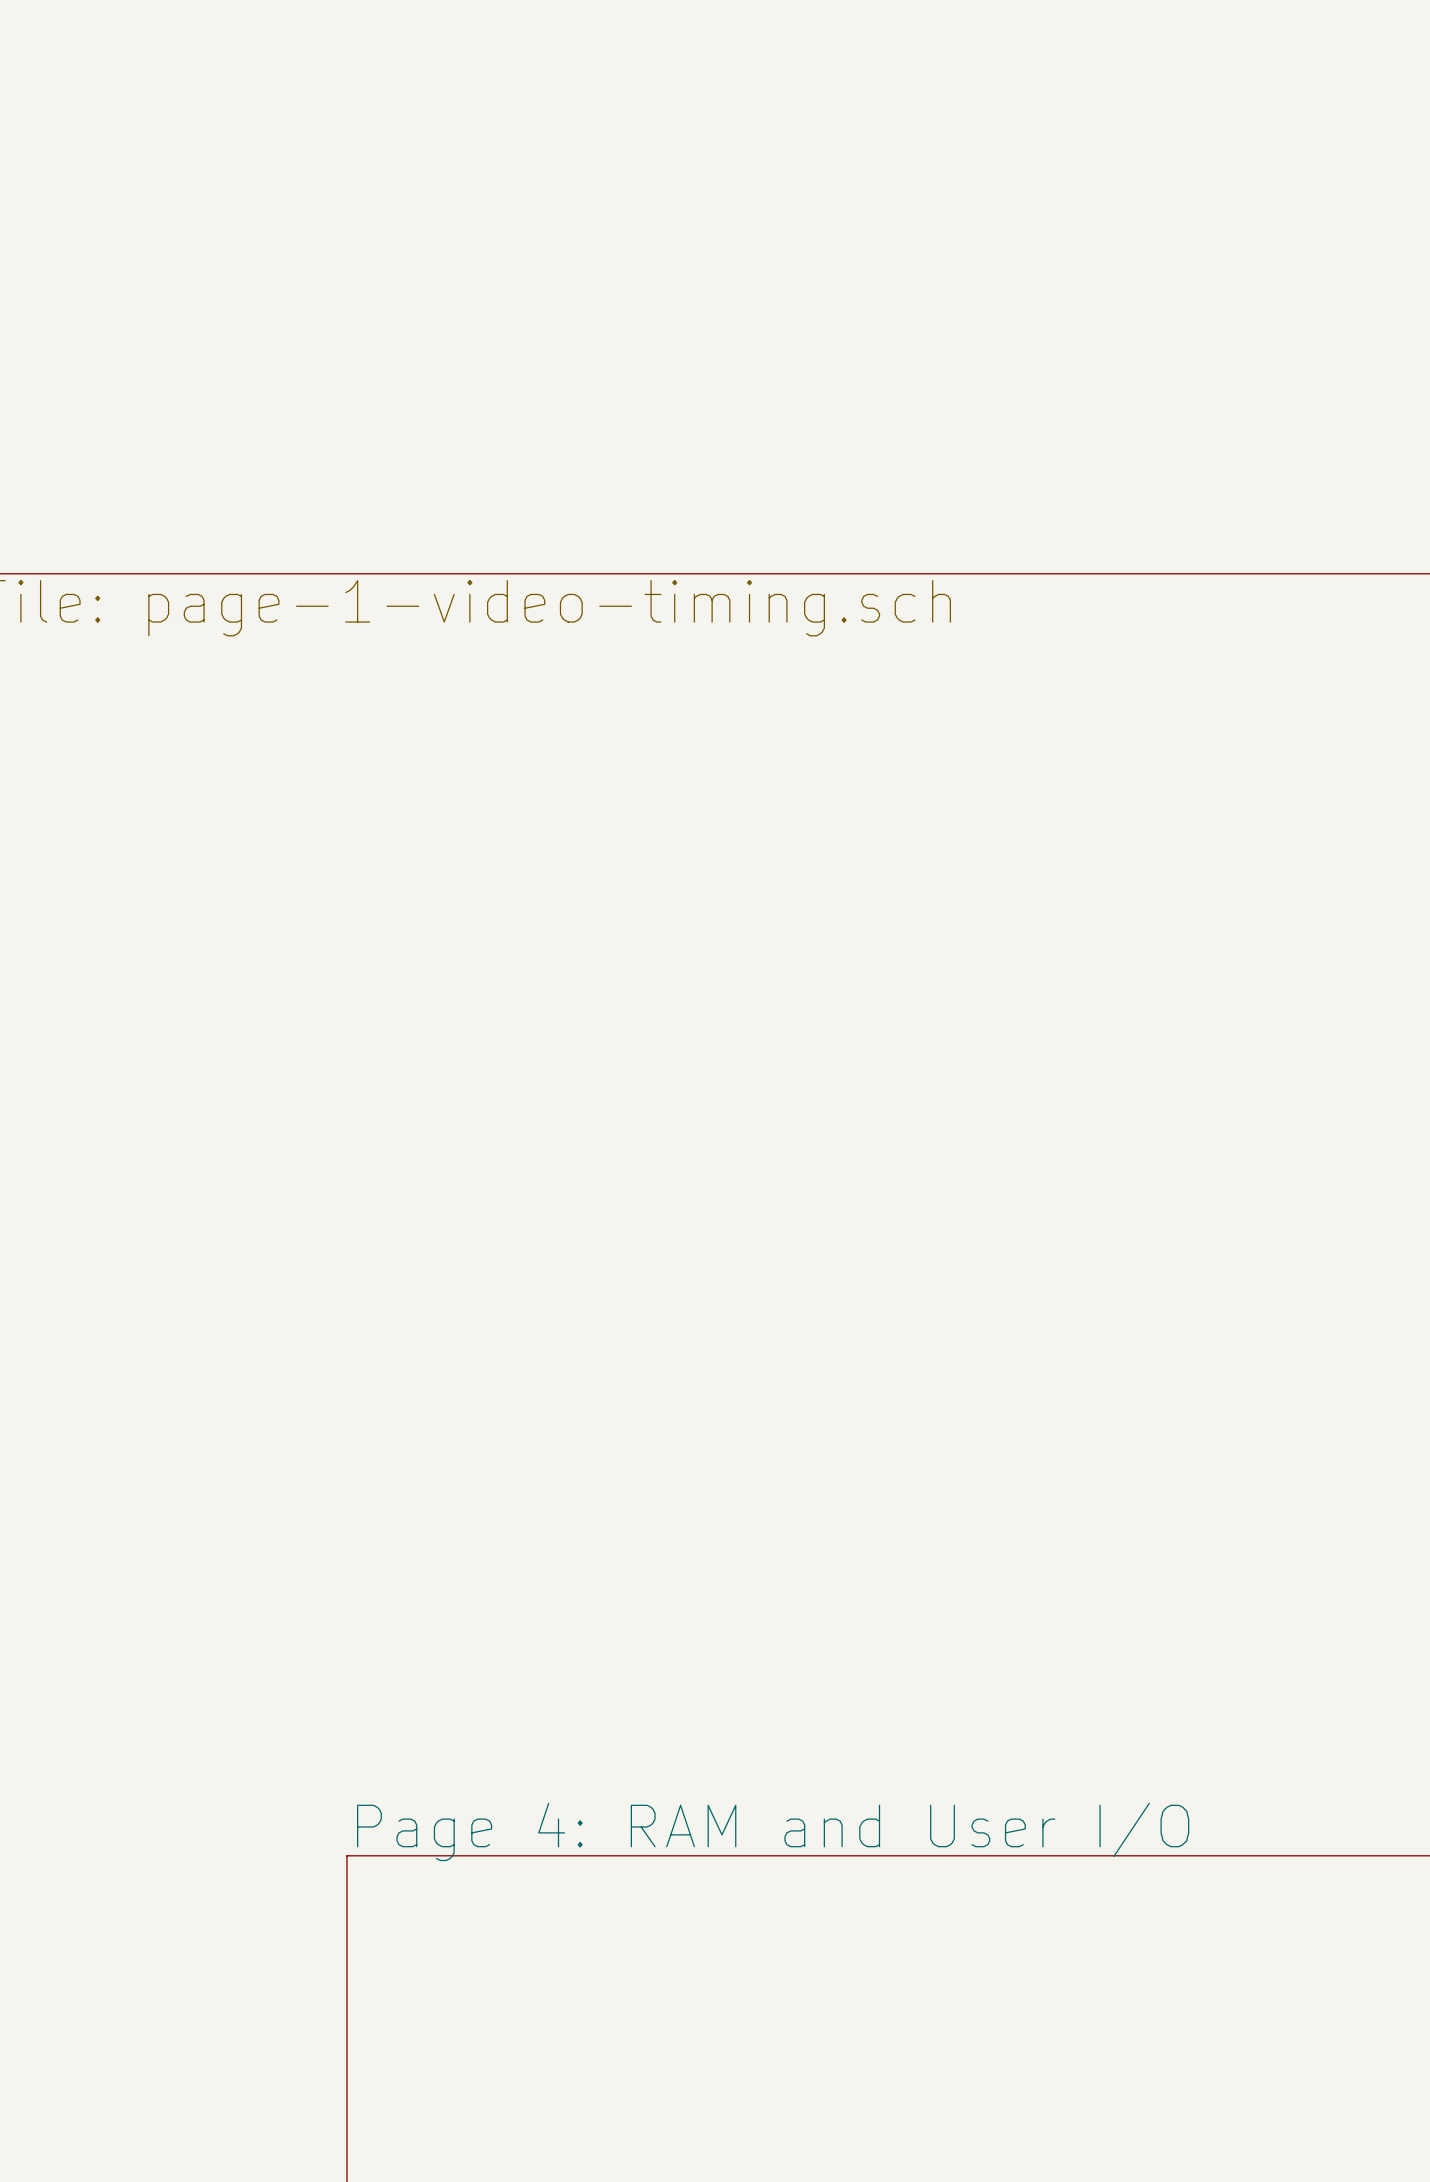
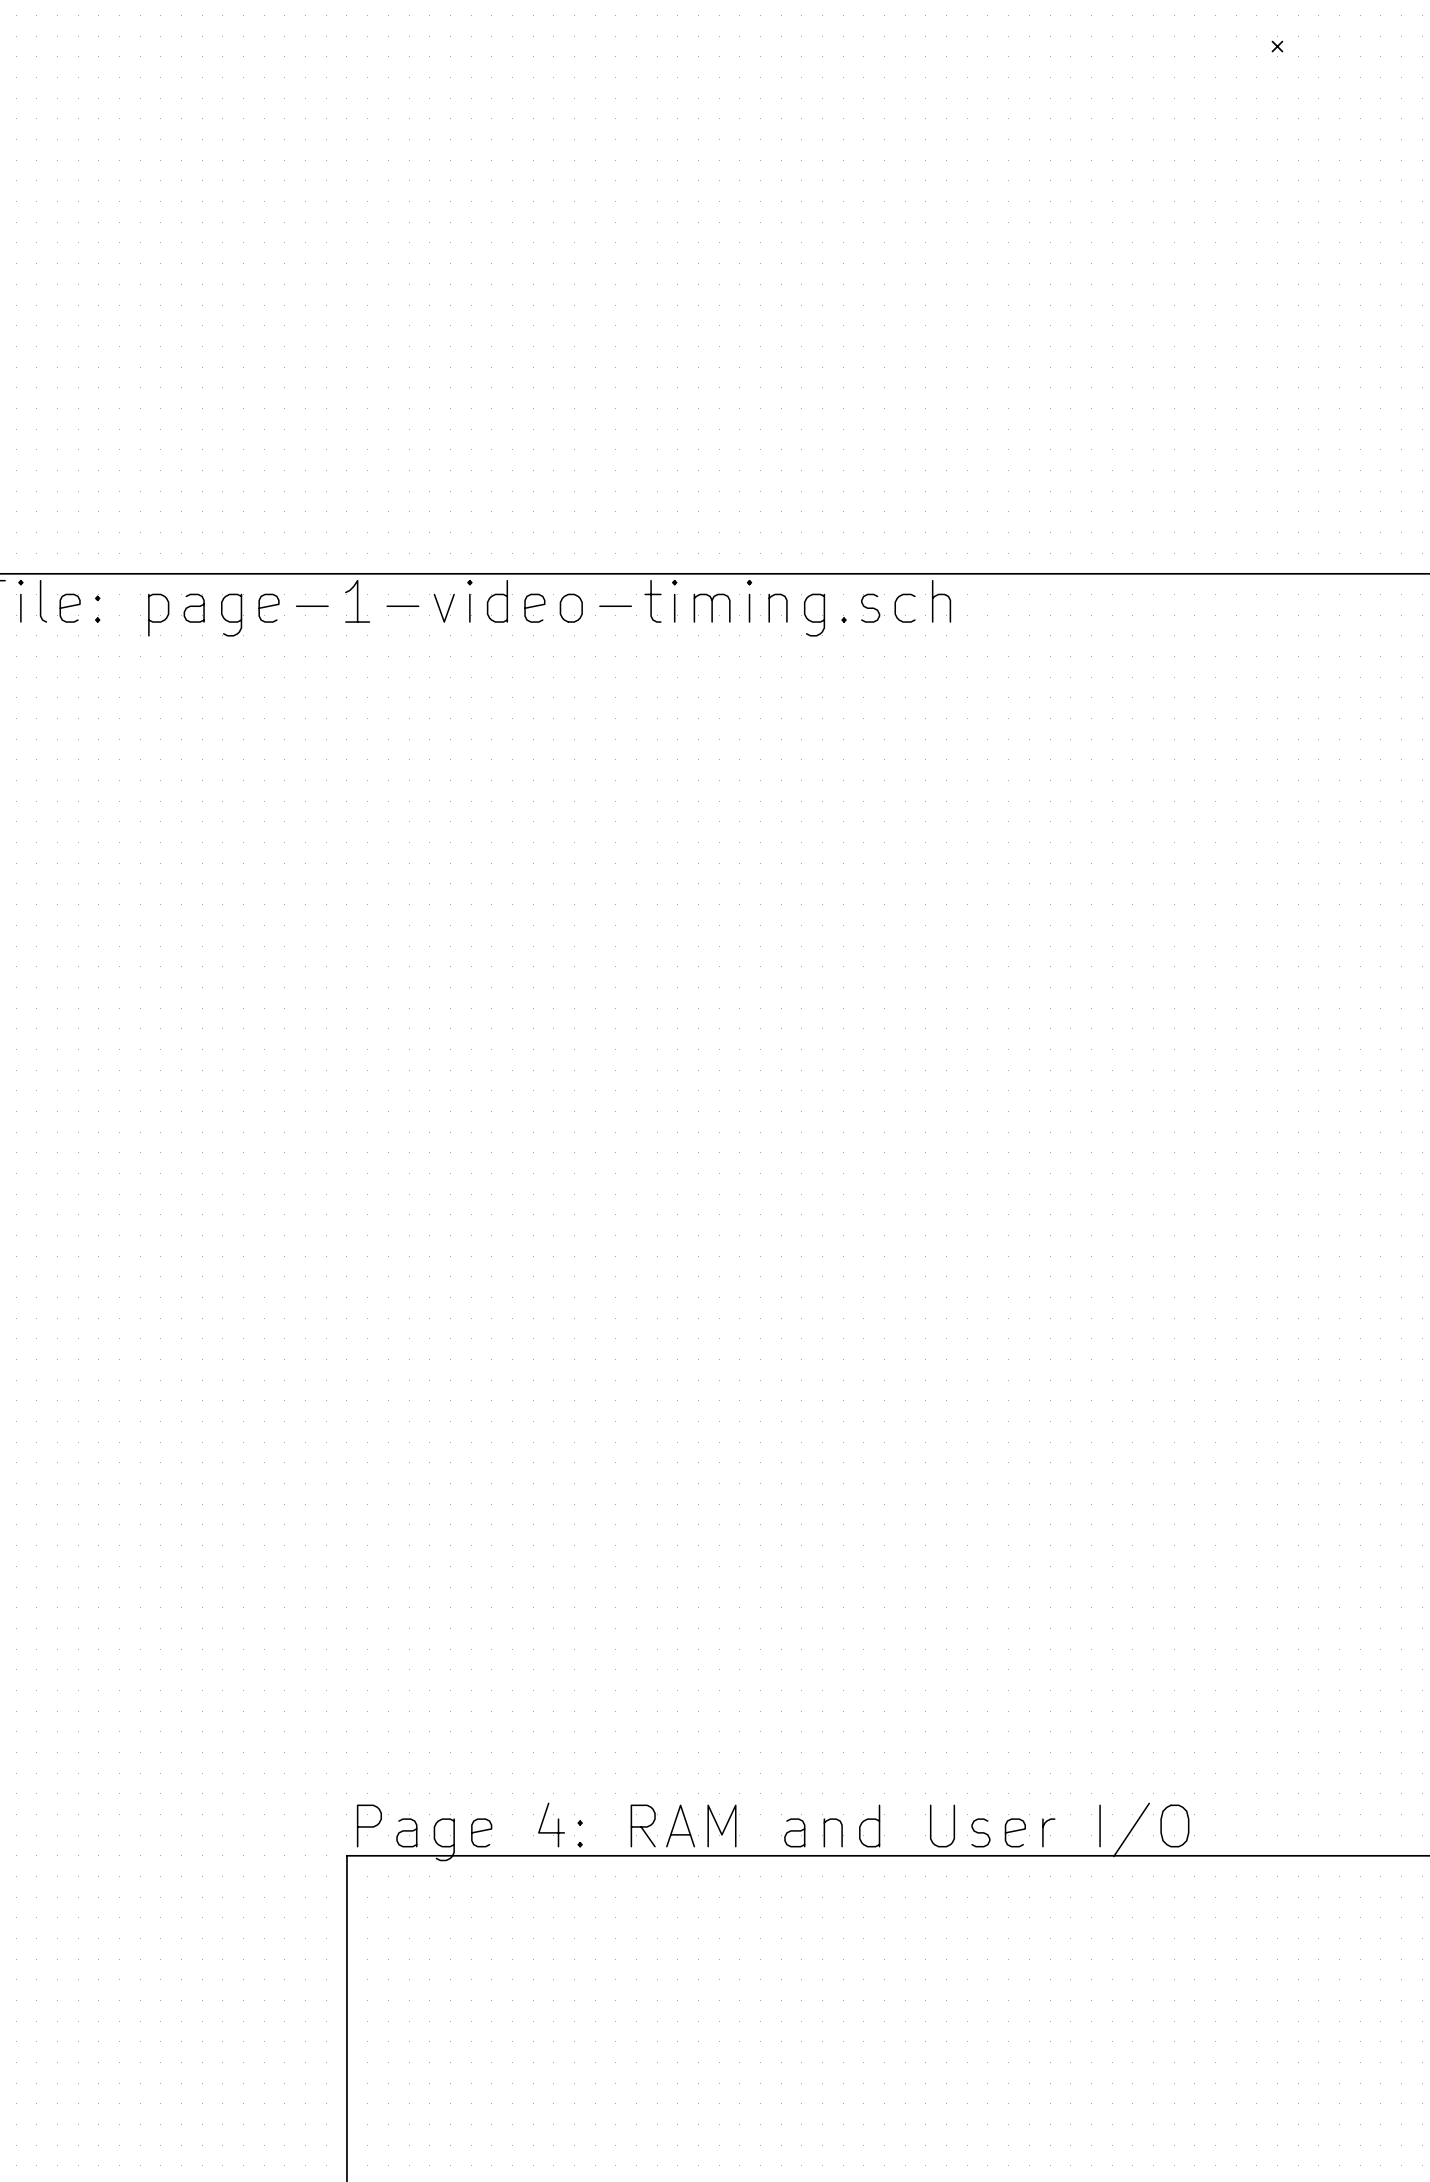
no-connect mark: none -> (1277, 46)

